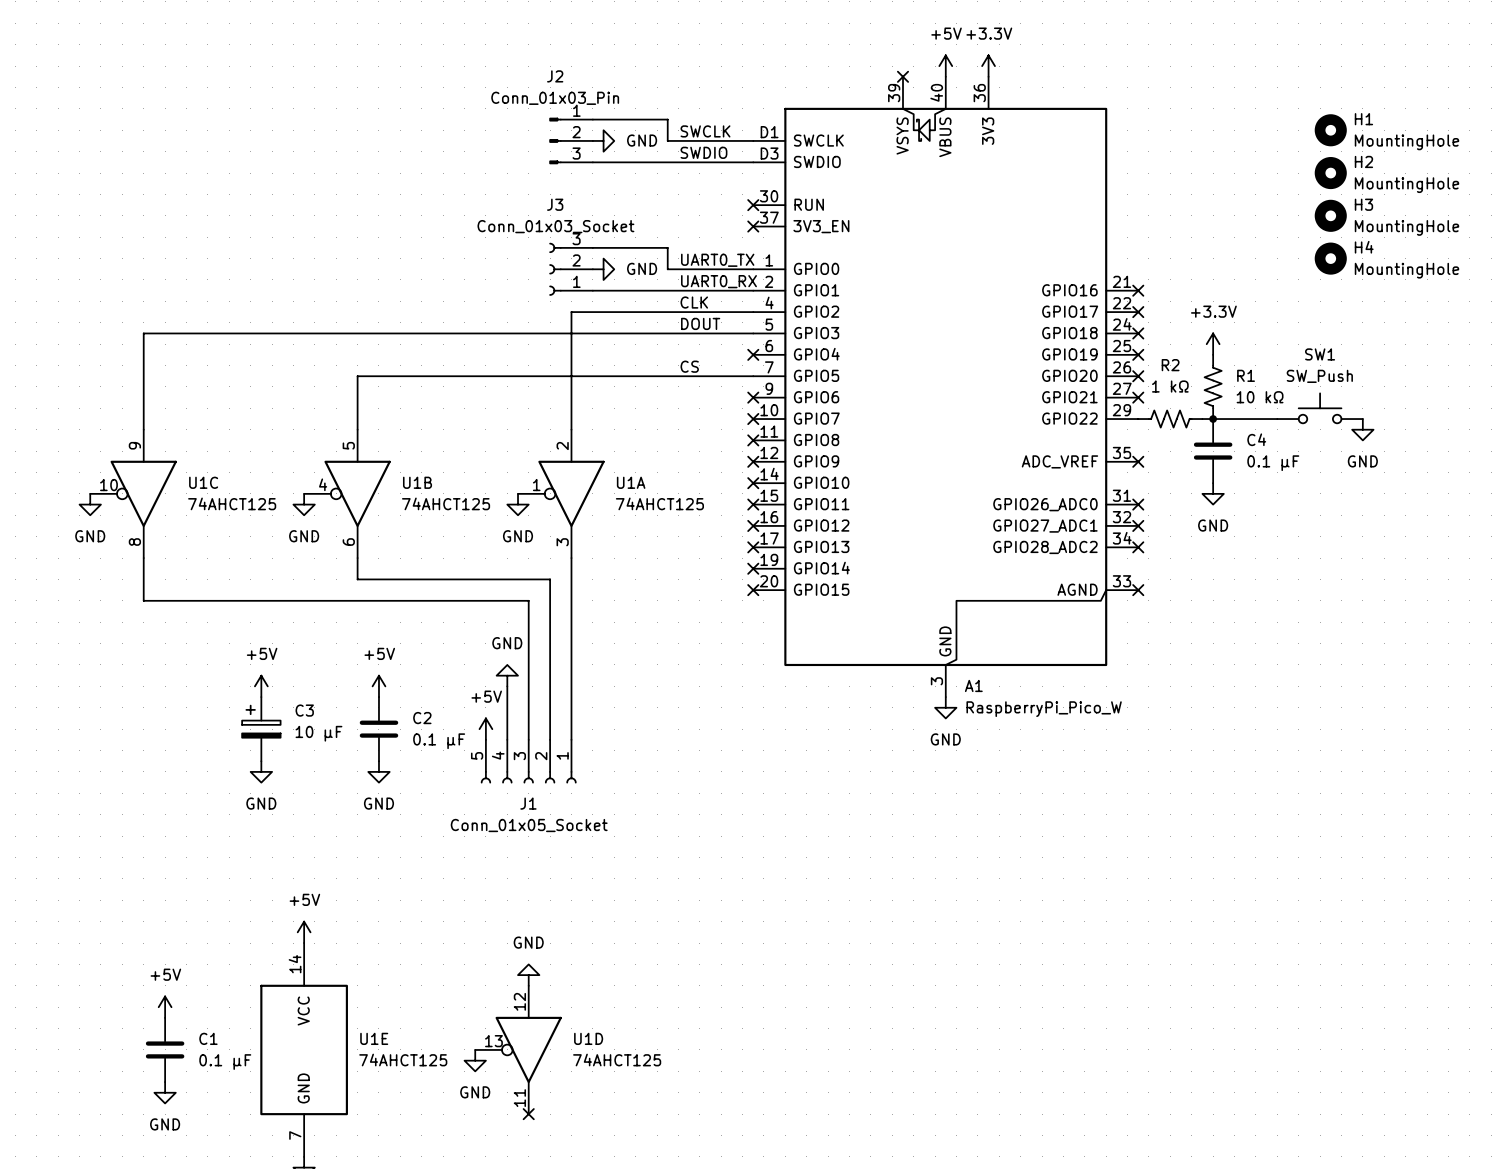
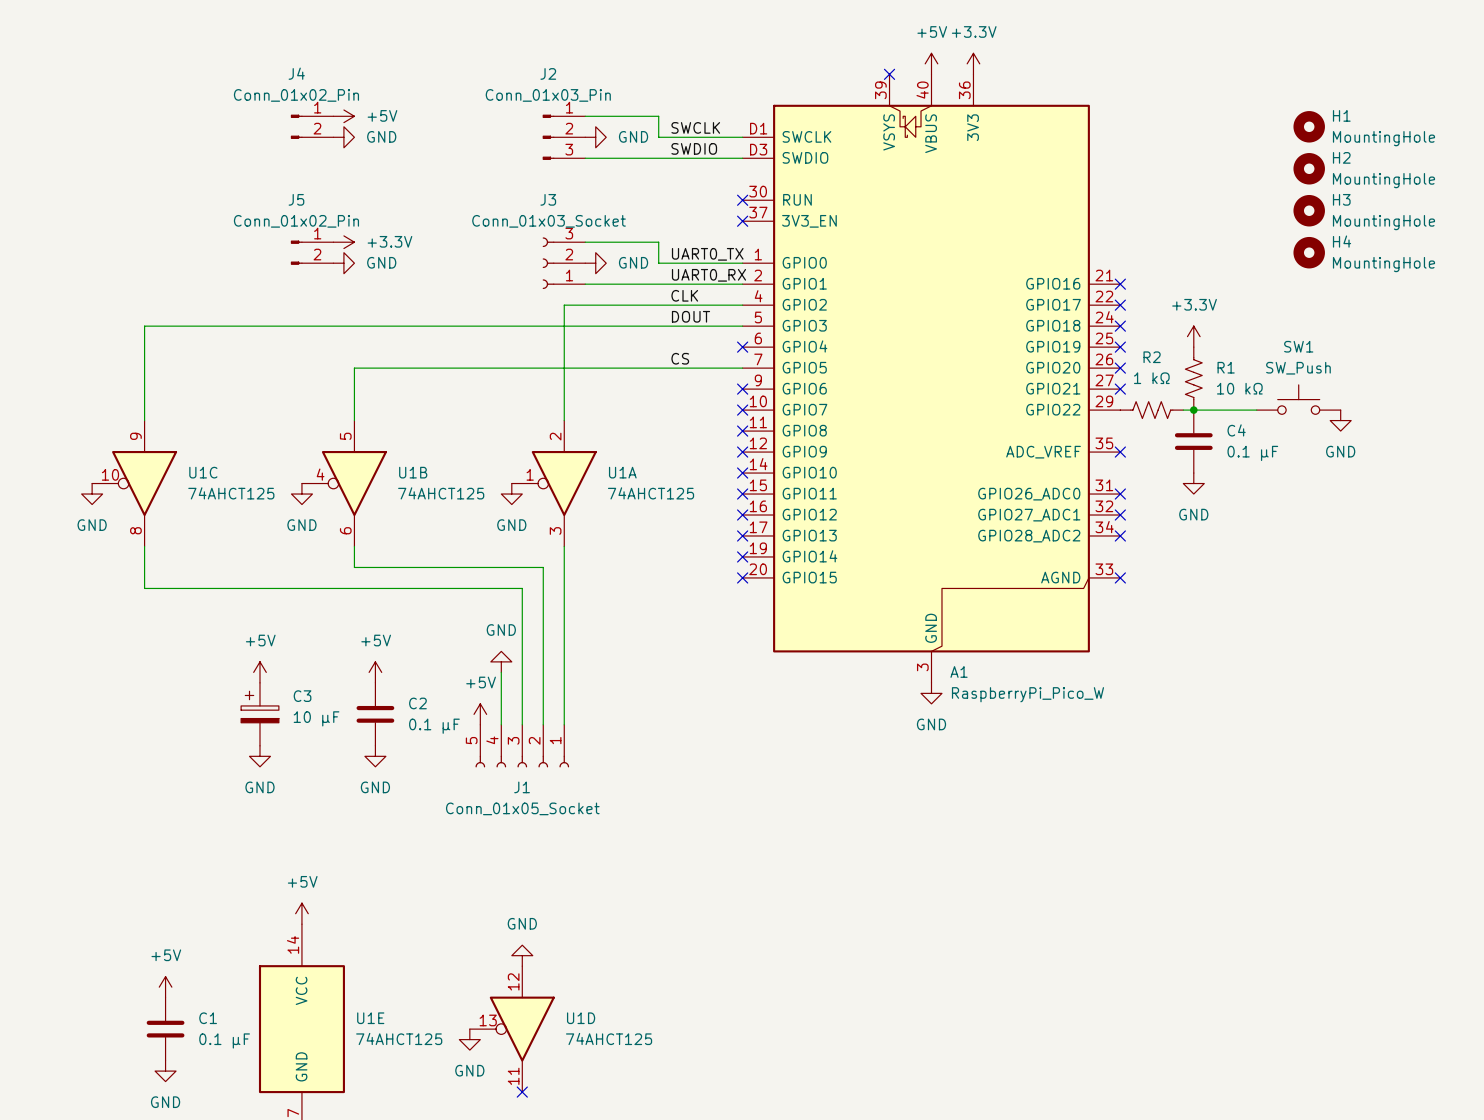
power symbol: none -> +5V (343, 116)
J4: none -> Conn_01x02_Pin (312, 126)
power symbol: none -> GND (343, 137)
power symbol: none -> +3.3V (343, 242)
J5: none -> Conn_01x02_Pin (312, 252)
power symbol: none -> GND (343, 263)

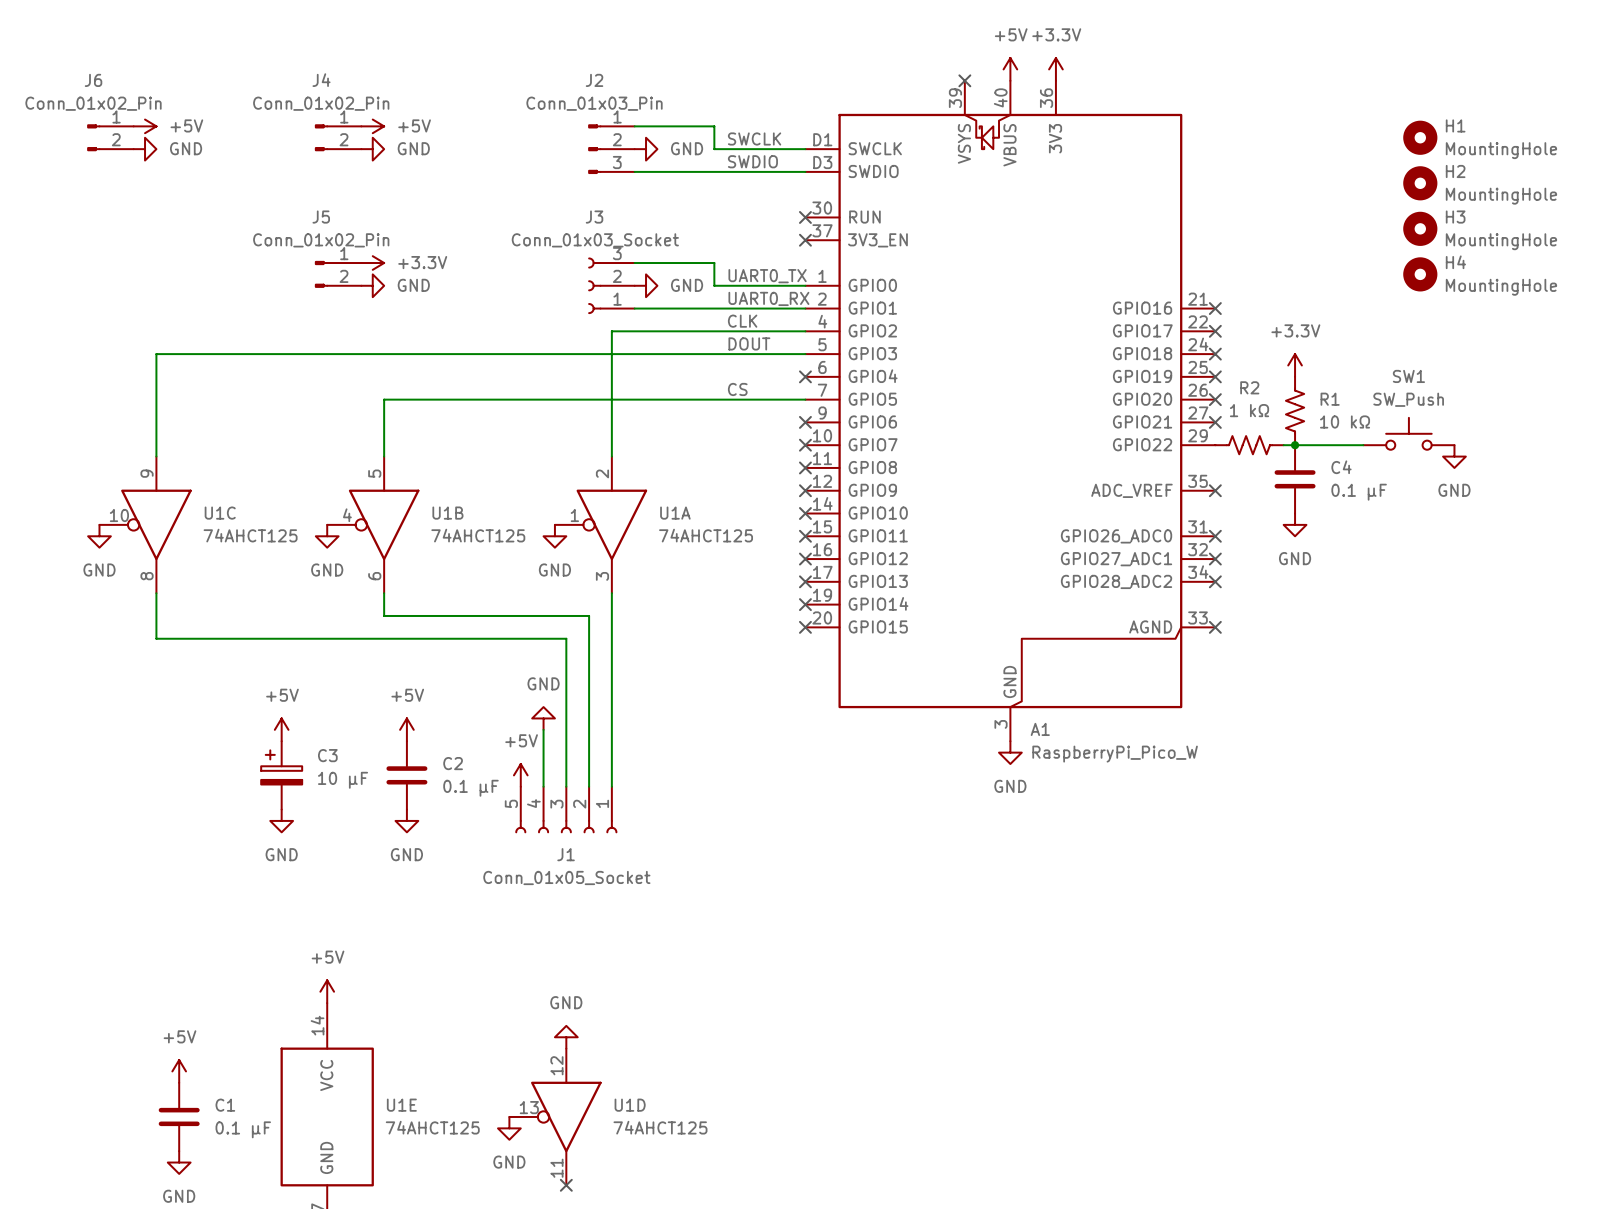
power symbol: none -> +5V (145, 126)
J6: none -> Conn_01x02_Pin (110, 137)
power symbol: none -> GND (145, 149)

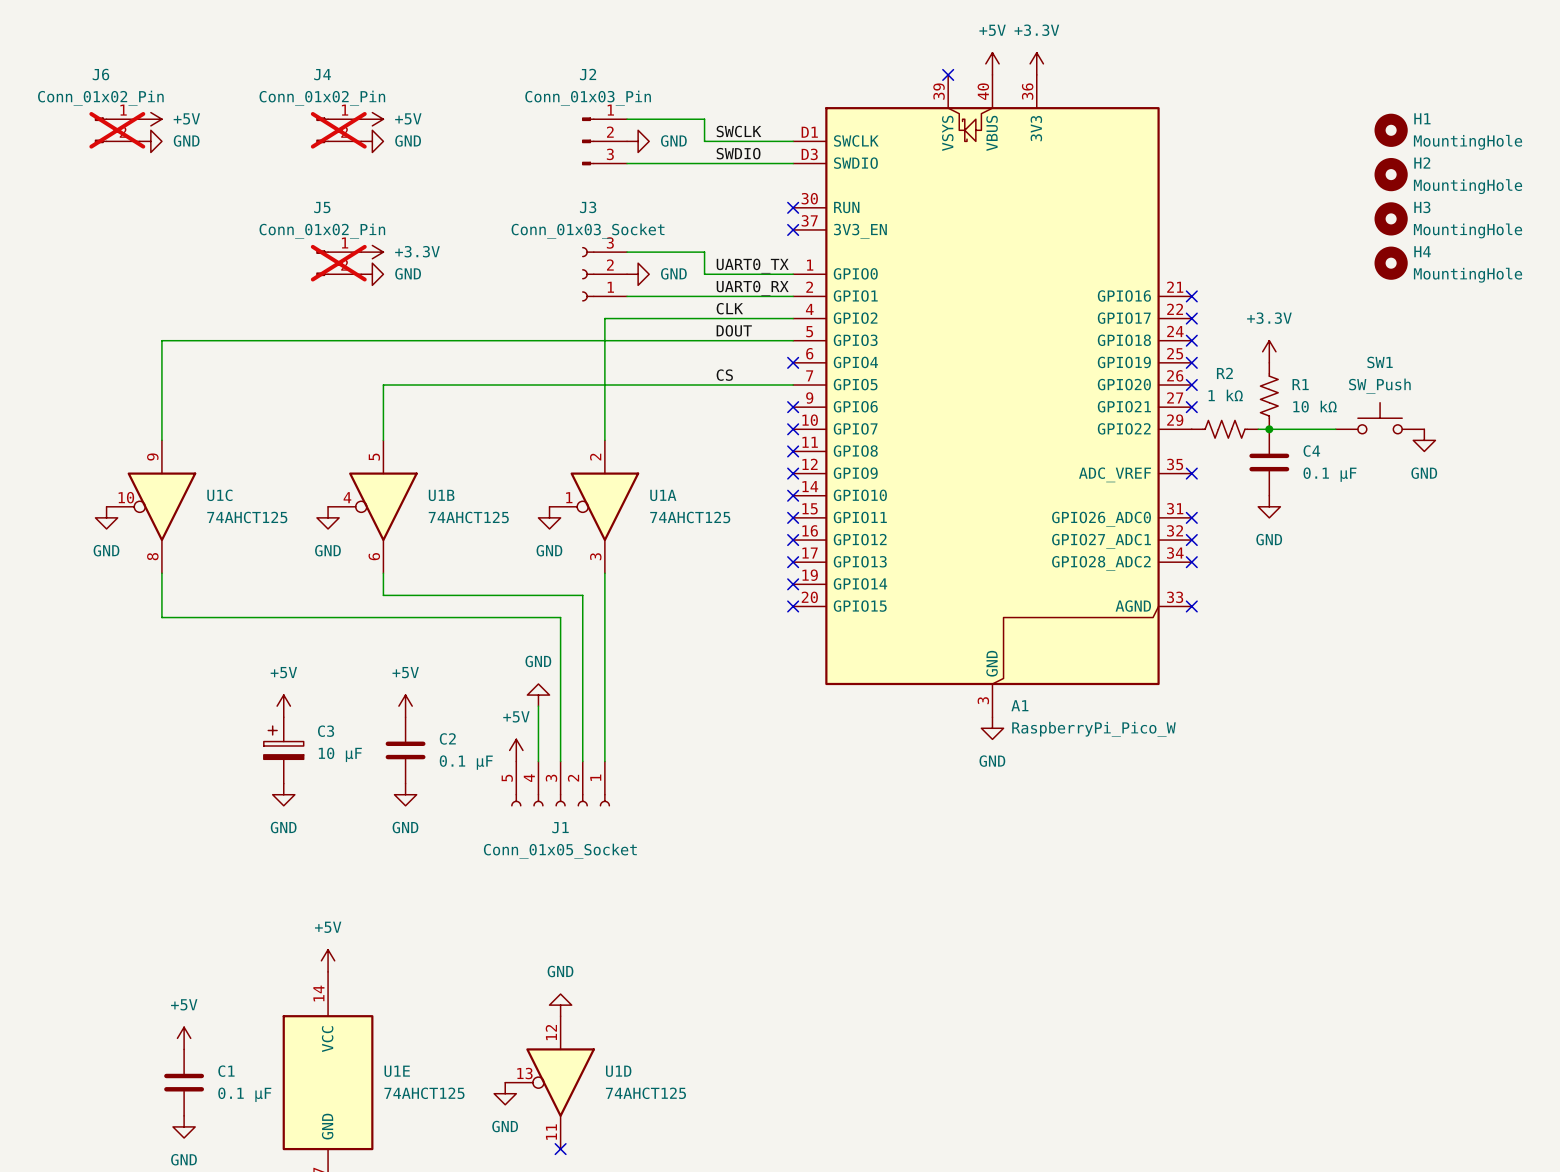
J6 do-not-place cross: none -> (117, 130)
J4 do-not-place cross: none -> (338, 130)
J5 do-not-place cross: none -> (338, 263)

